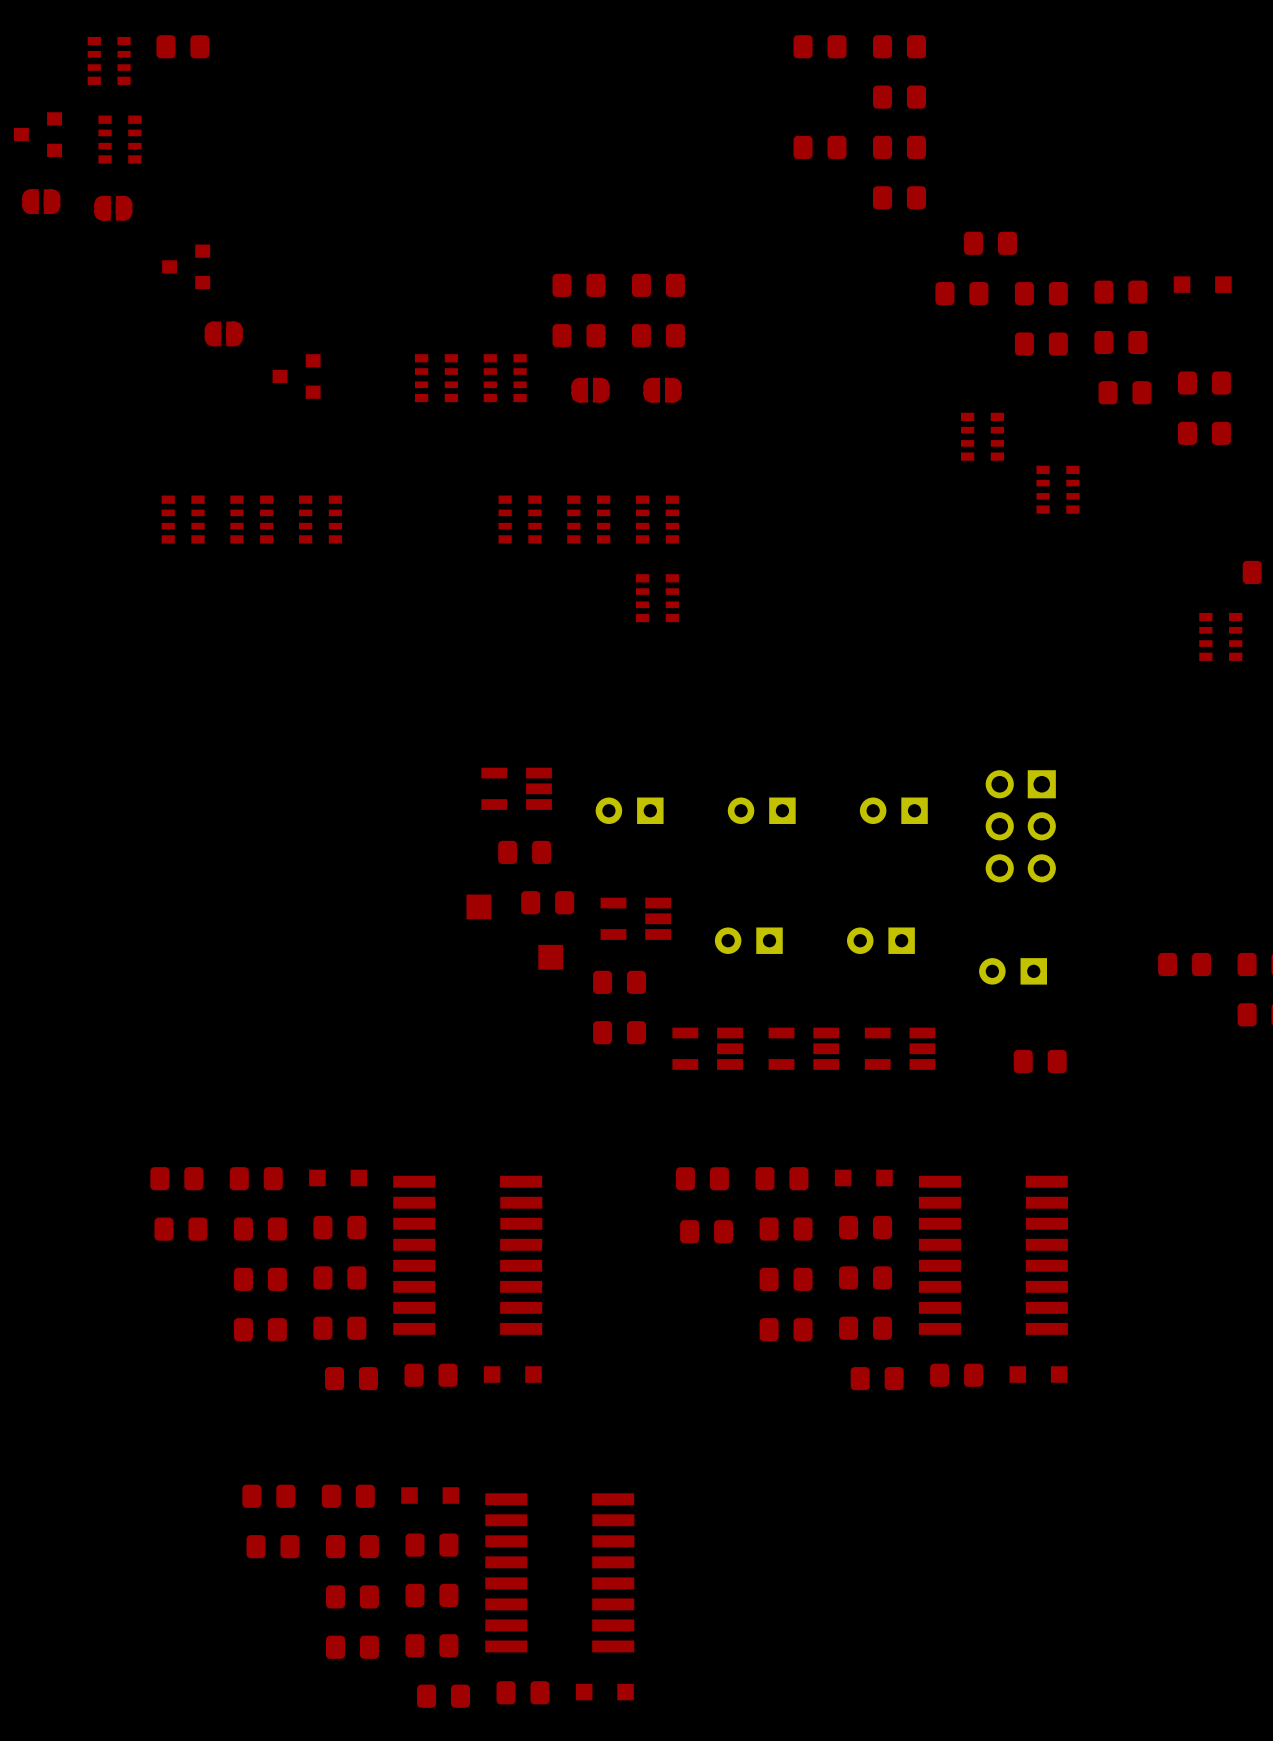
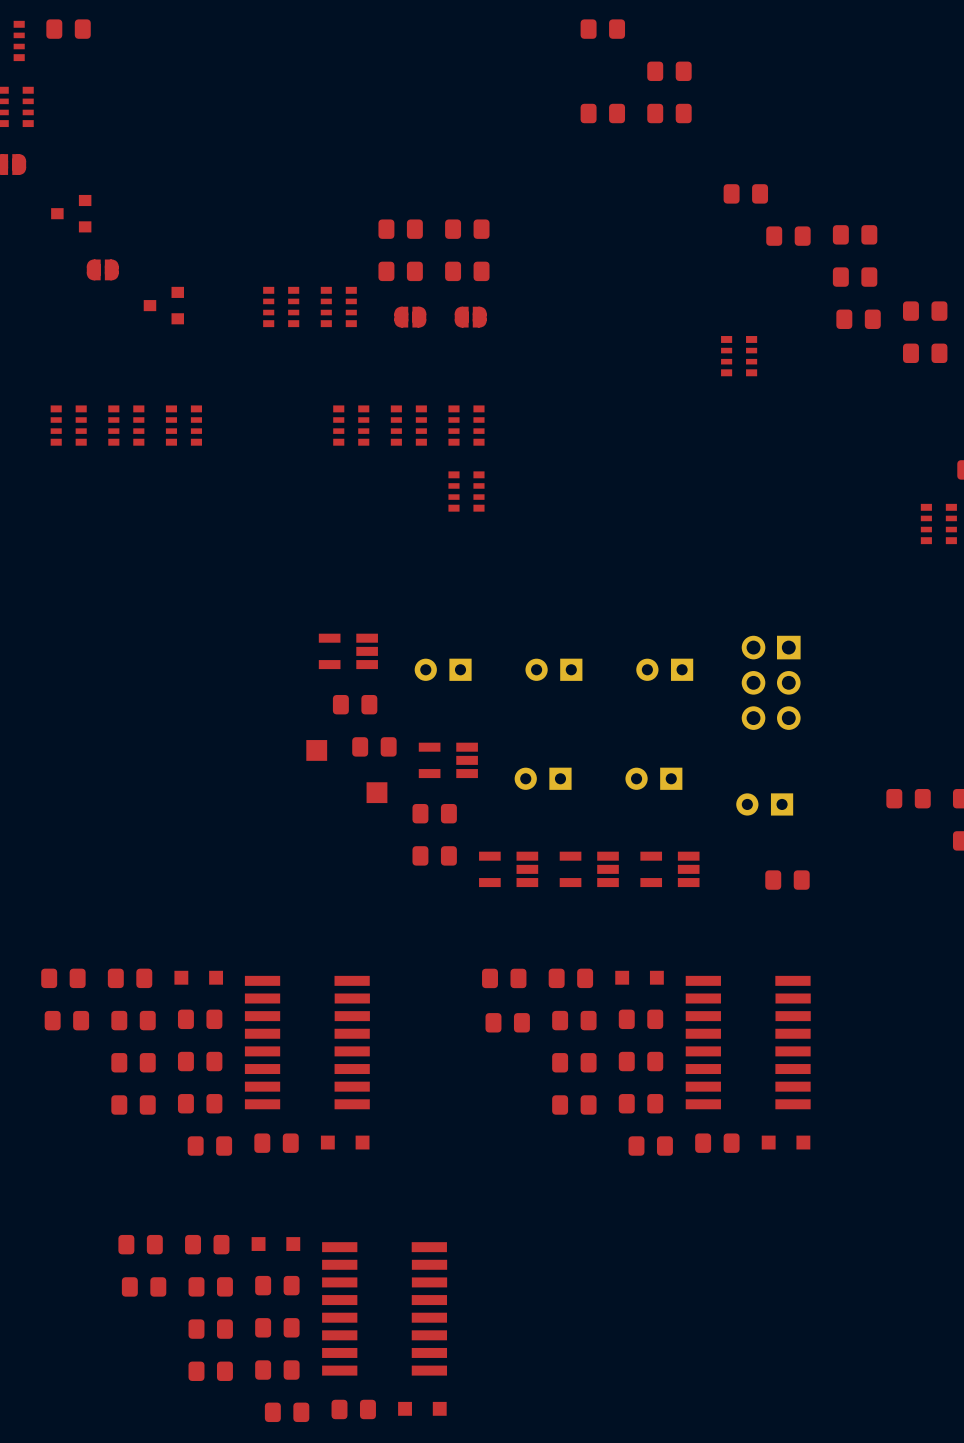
part: (899, 46) -> none
part: (899, 197) -> none
part: (1202, 284) -> none
part: (961, 293) -> none
part: (1041, 344) -> none
part: (1058, 489) -> none

